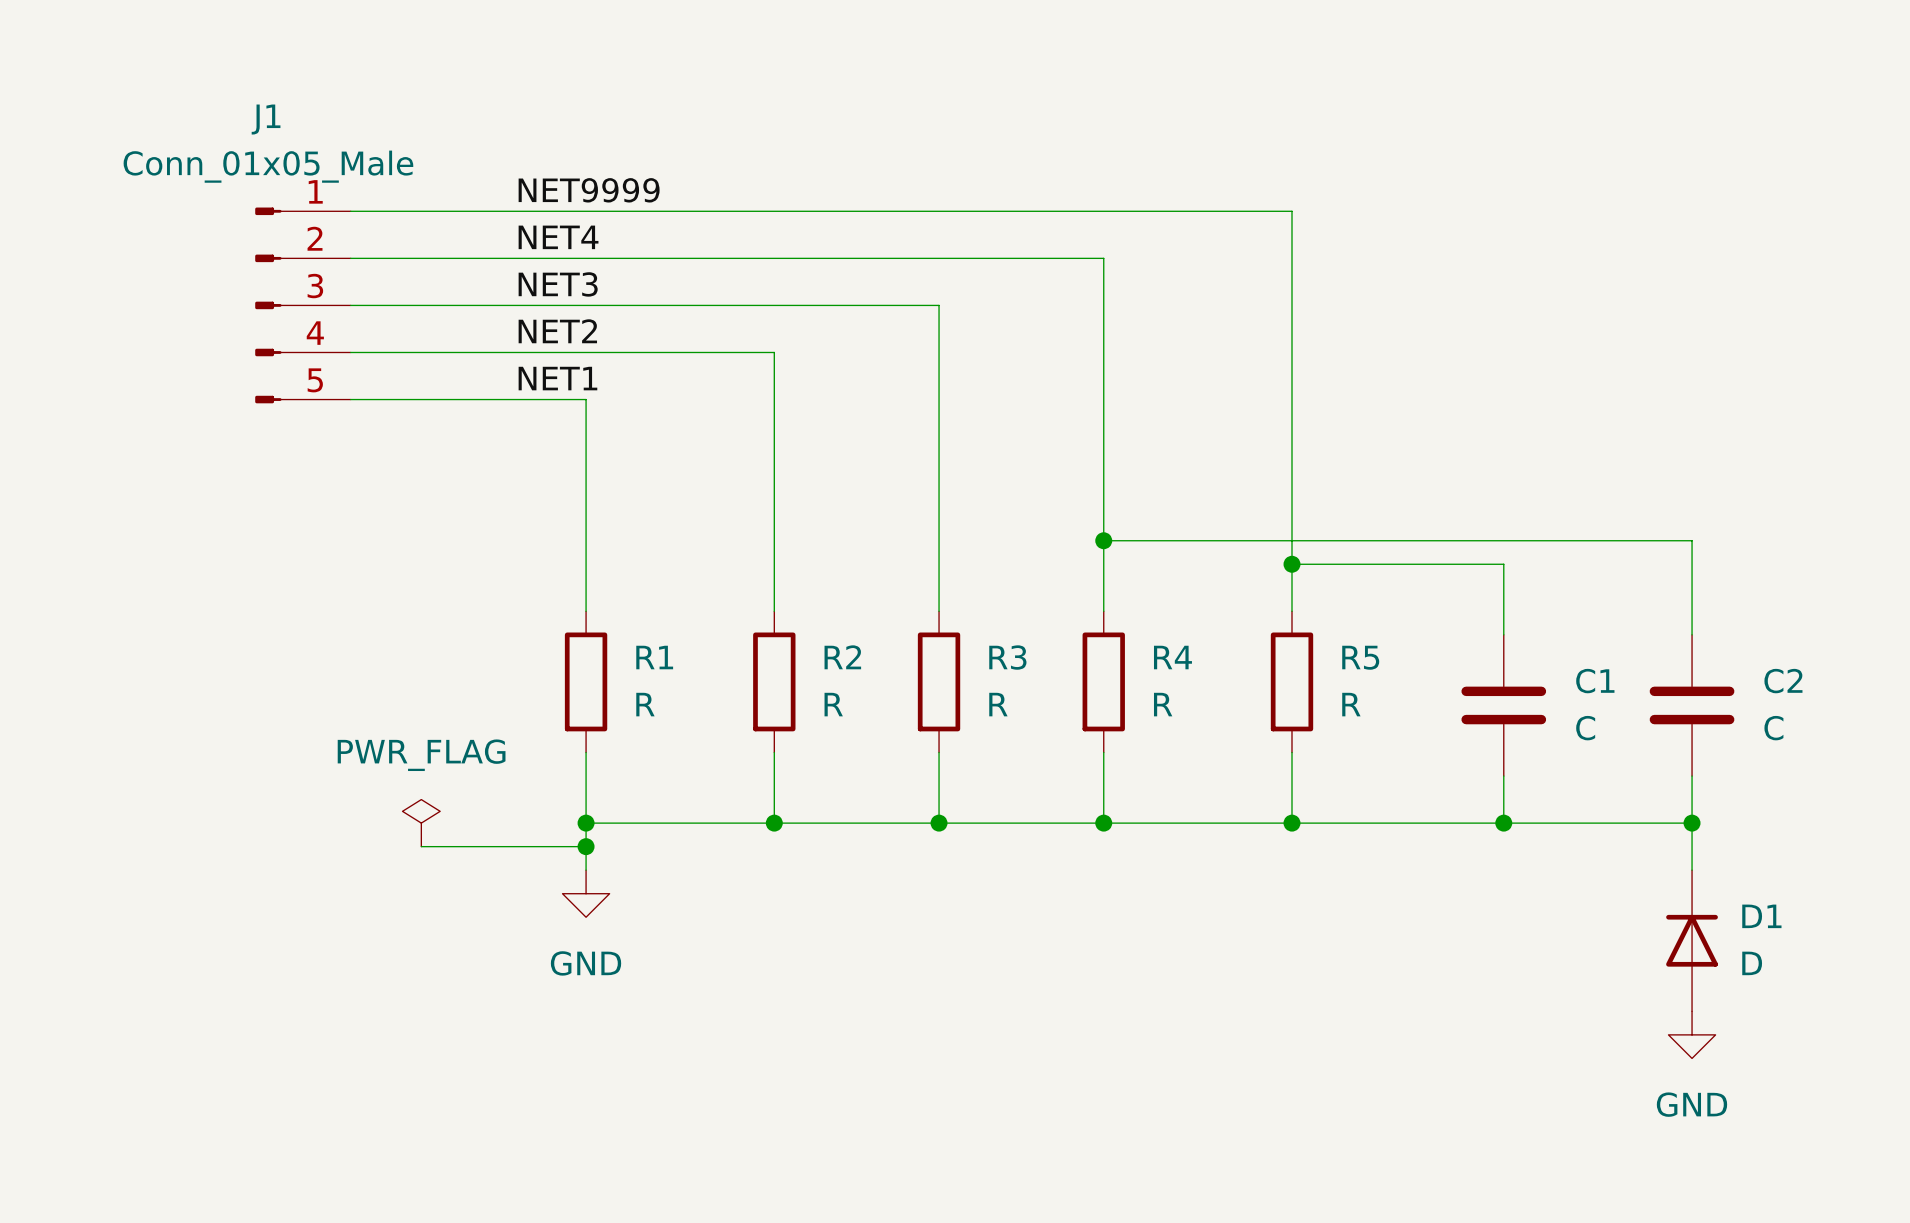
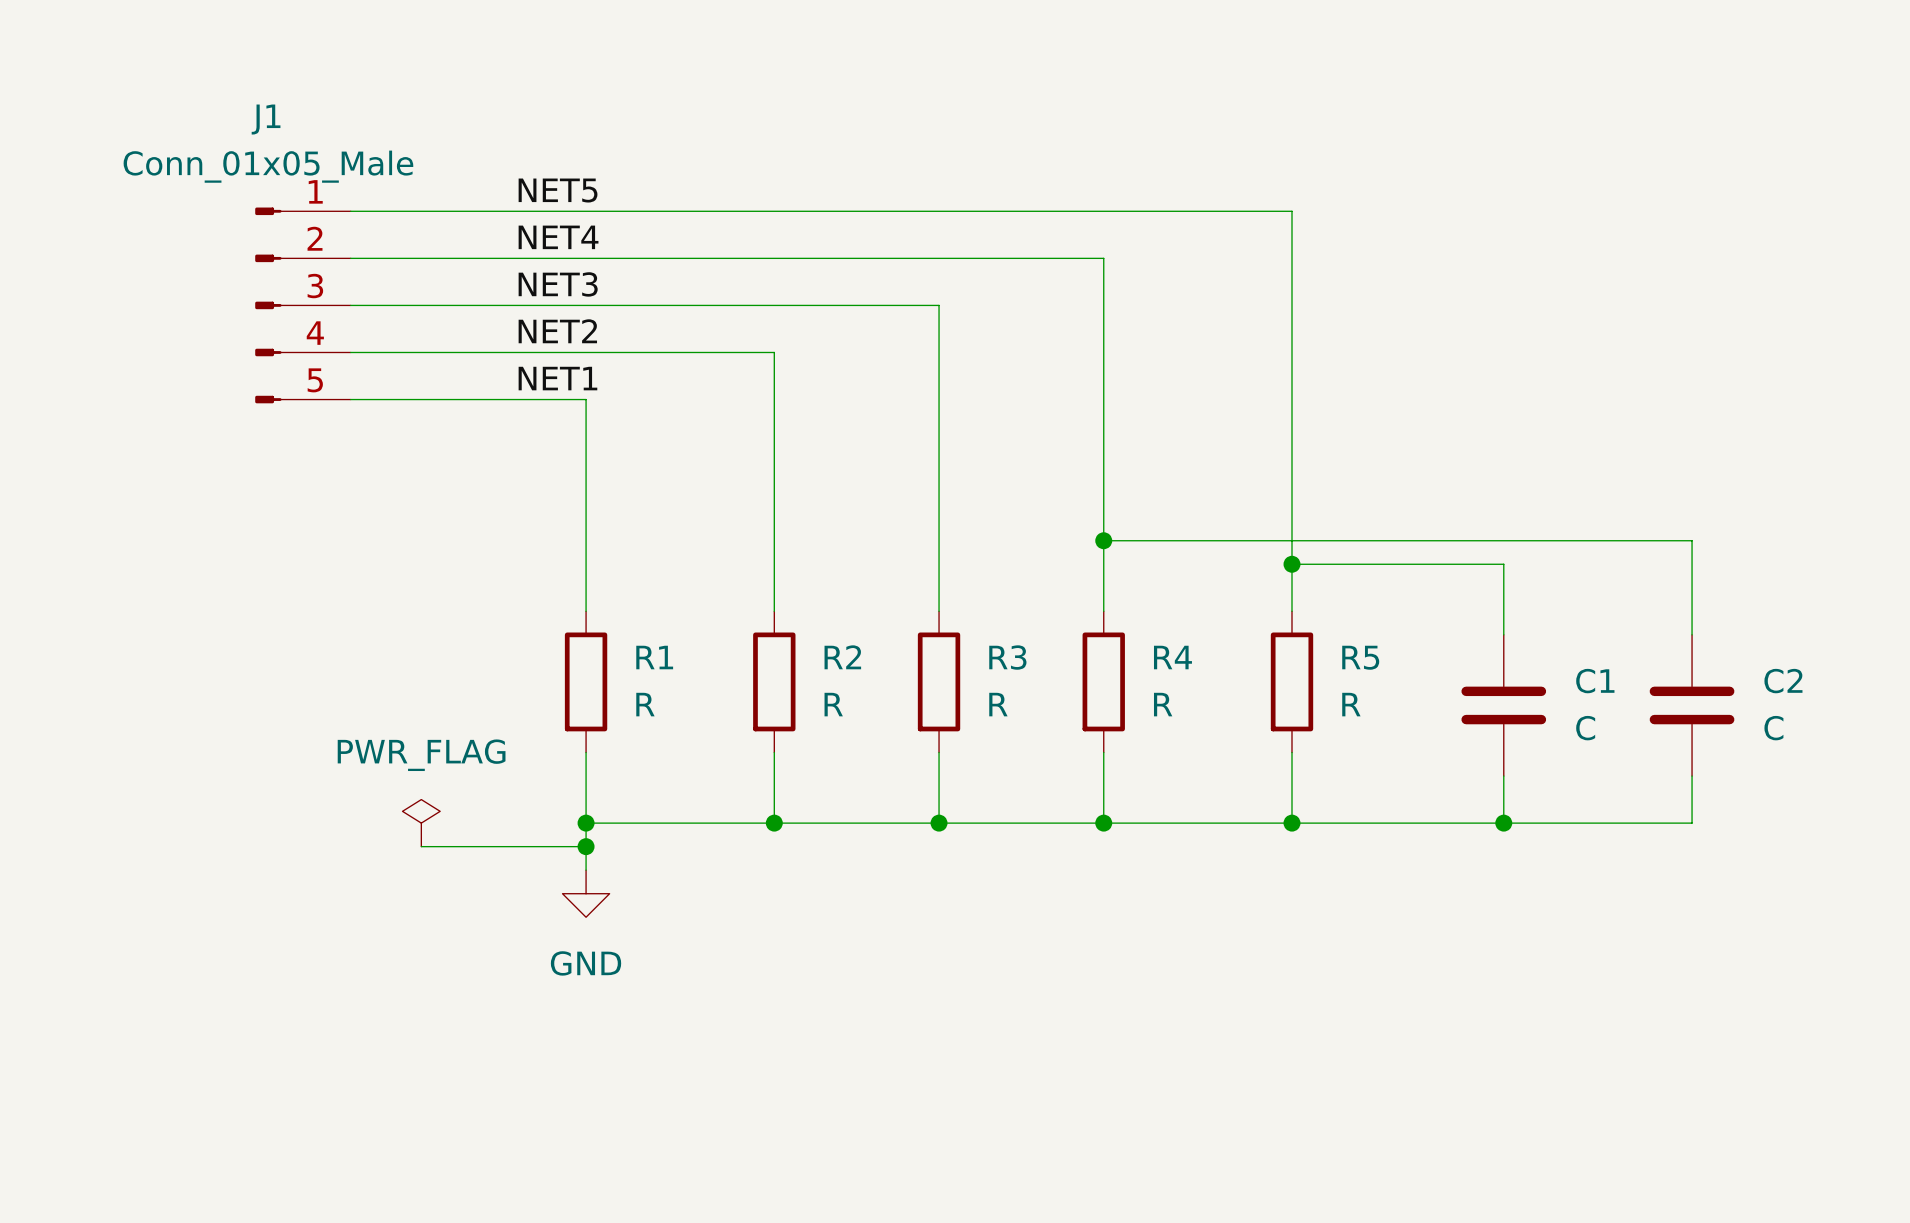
label: NET9999 (589, 190) -> NET5 (558, 190)
wire: (1692, 823) (1692, 870) -> none
junction: (1692, 823) -> none
D1: D (1692, 940) -> none
power symbol: GND (1692, 1034) -> none

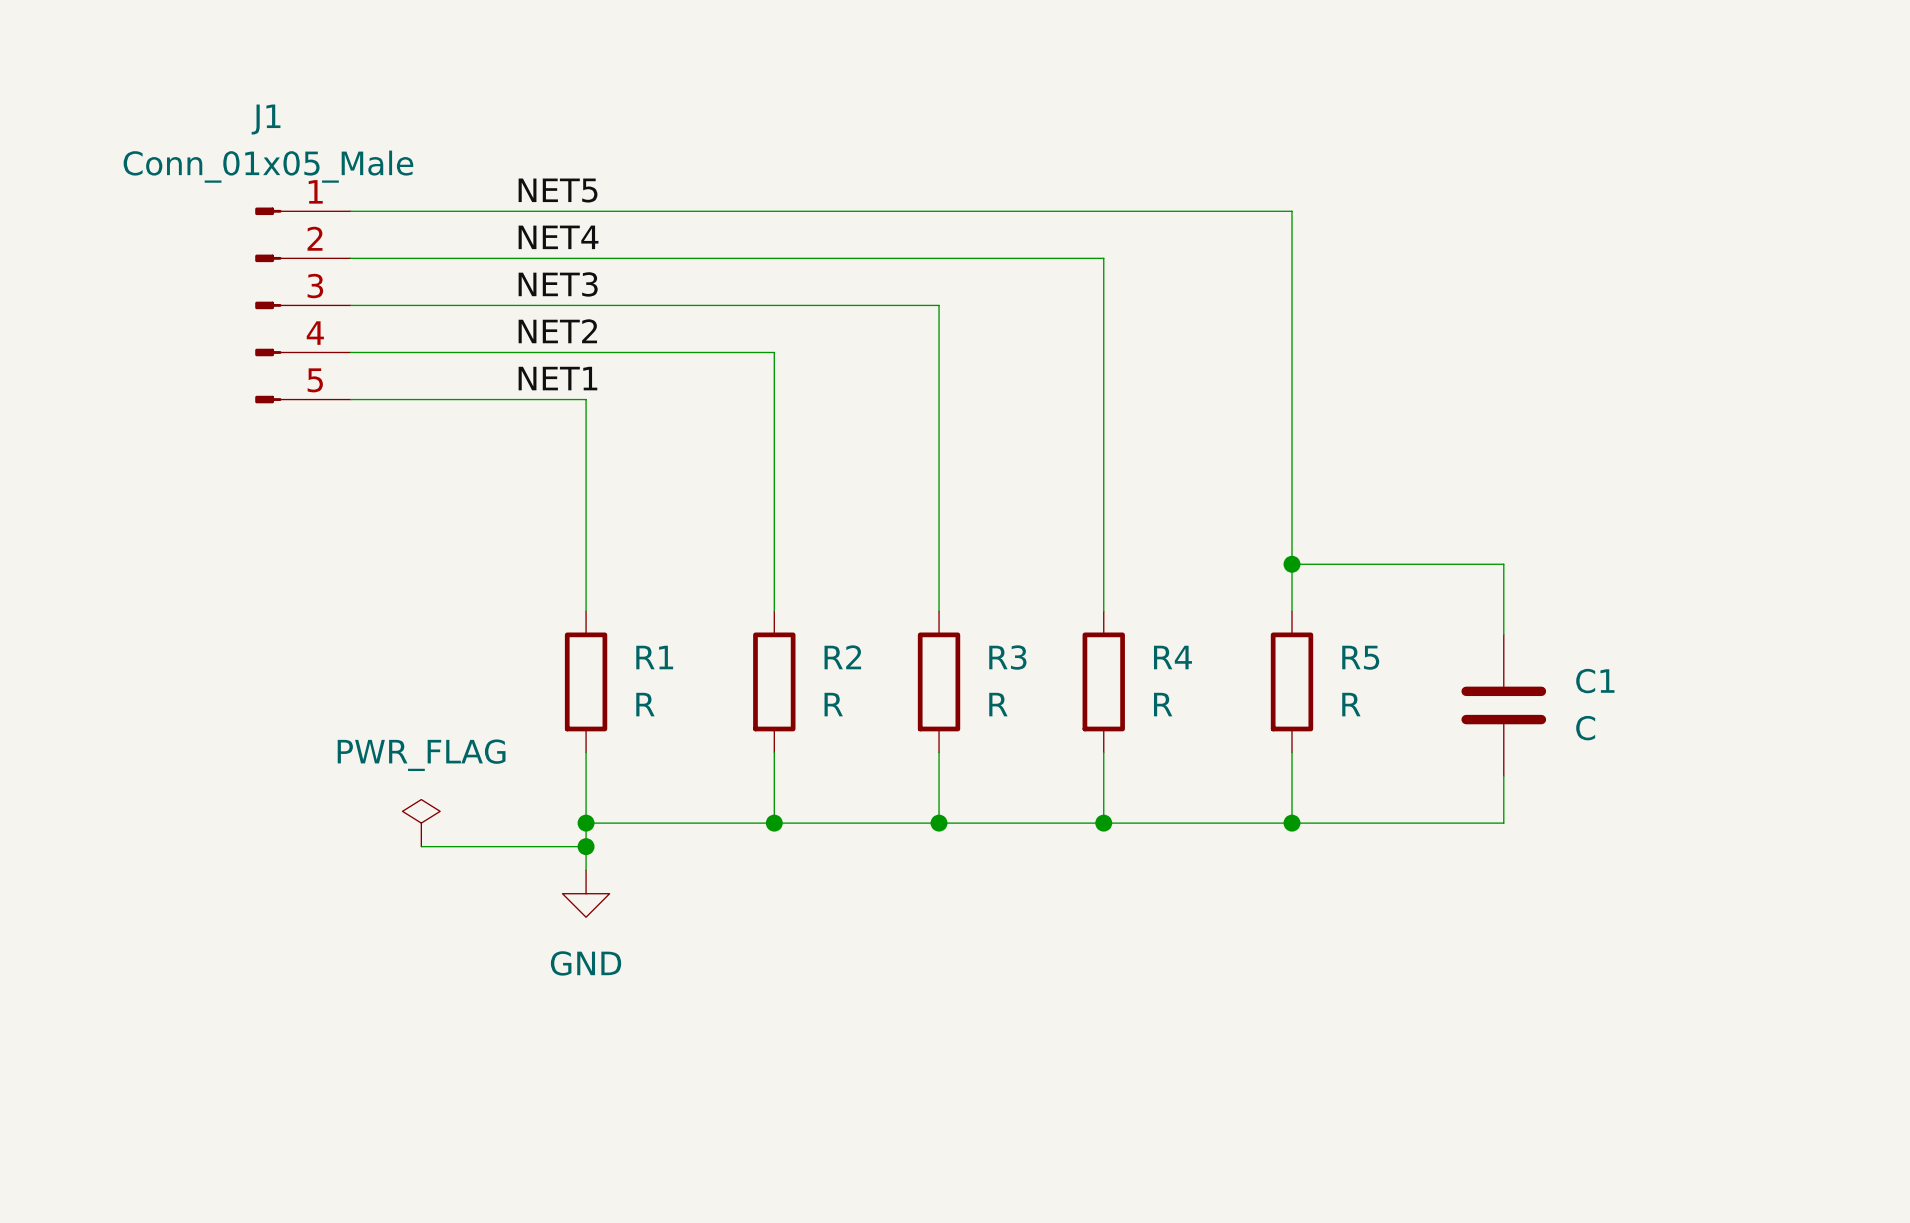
wire: (1103, 540) (1692, 540) (1692, 634) -> none
junction: (1103, 540) -> none
C2: C (1692, 705) -> none
wire: (1692, 776) (1692, 823) (1503, 823) -> none
junction: (1503, 823) -> none

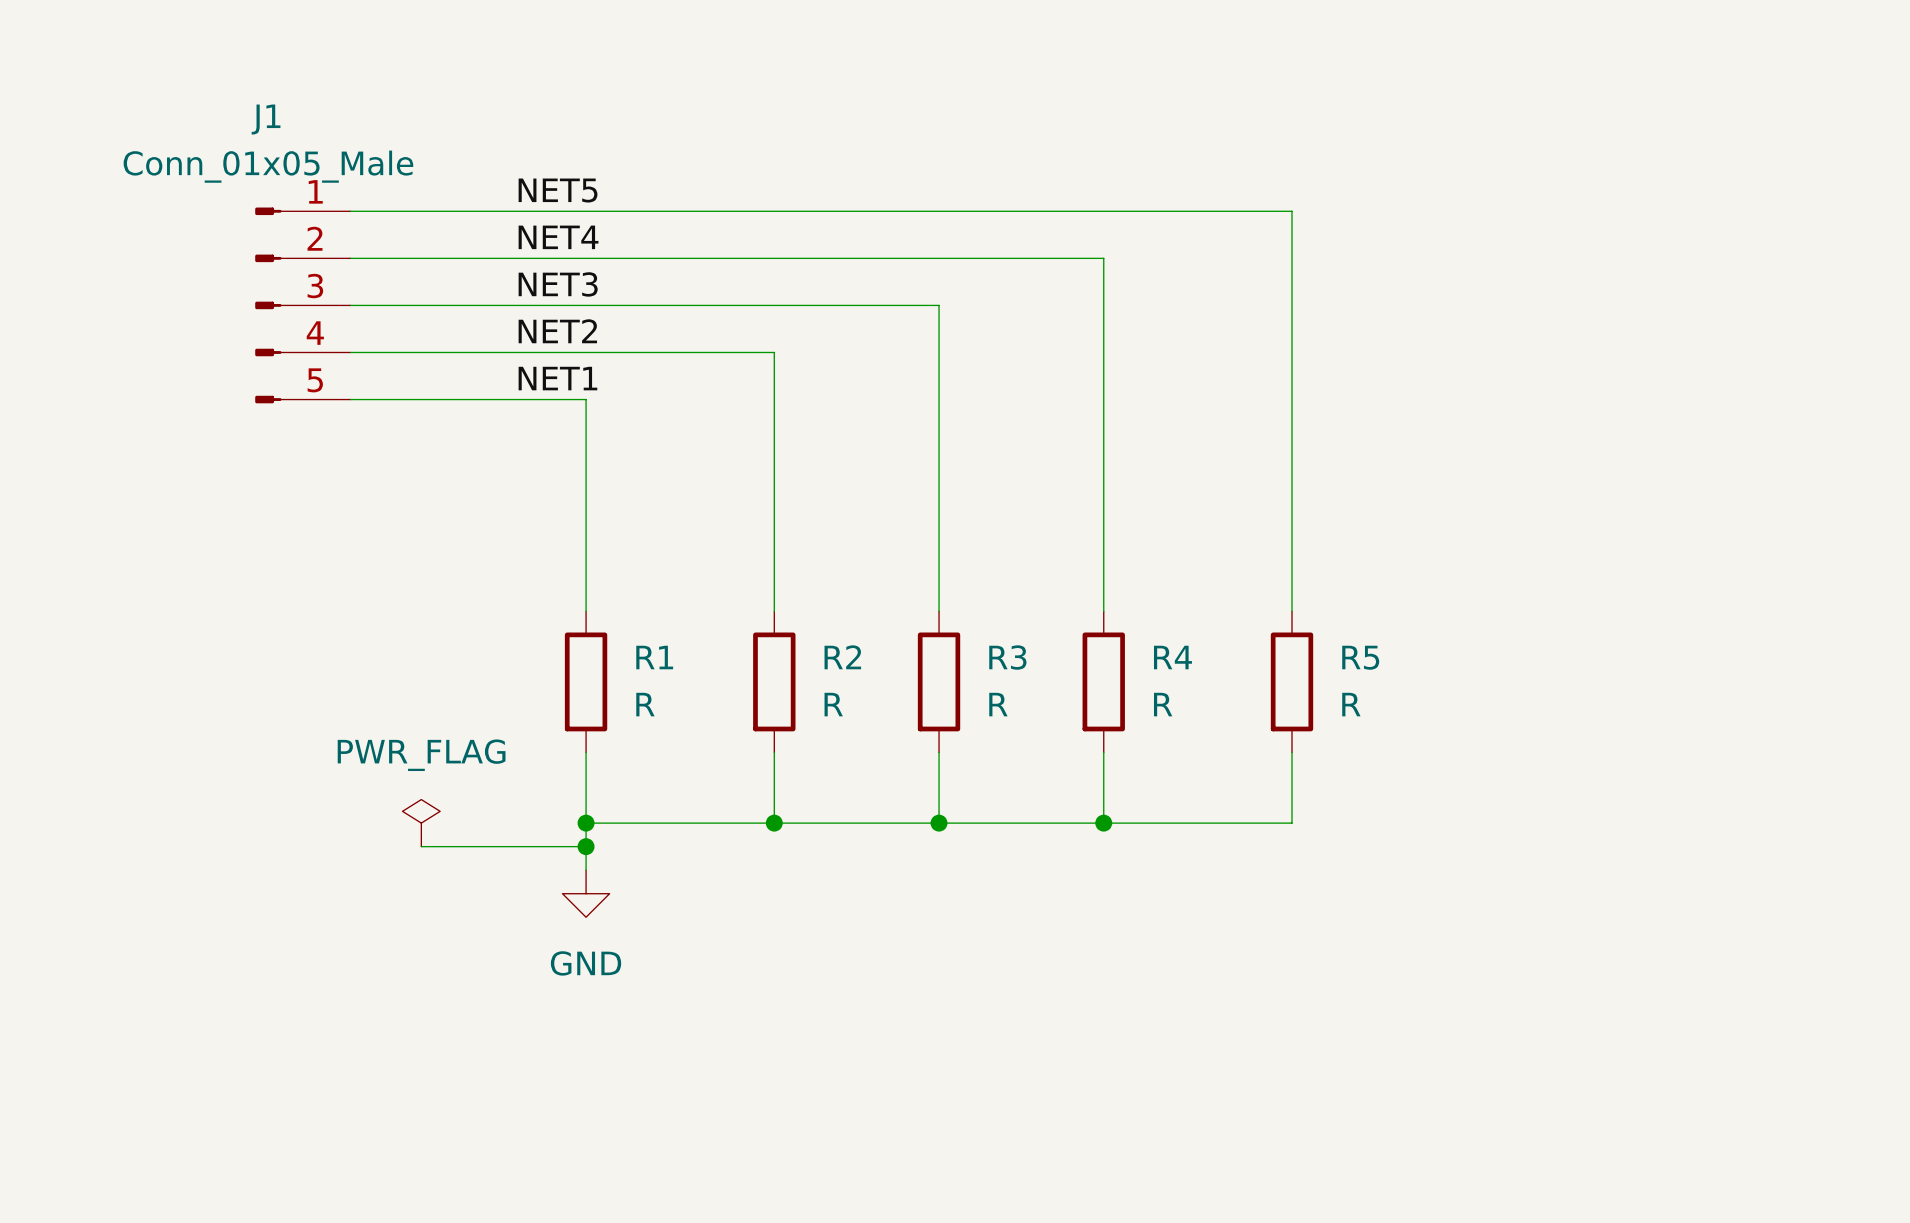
wire: (1292, 564) (1503, 564) (1503, 634) -> none
junction: (1292, 564) -> none
C1: C (1503, 705) -> none
wire: (1503, 776) (1503, 823) (1292, 823) -> none
junction: (1292, 823) -> none

